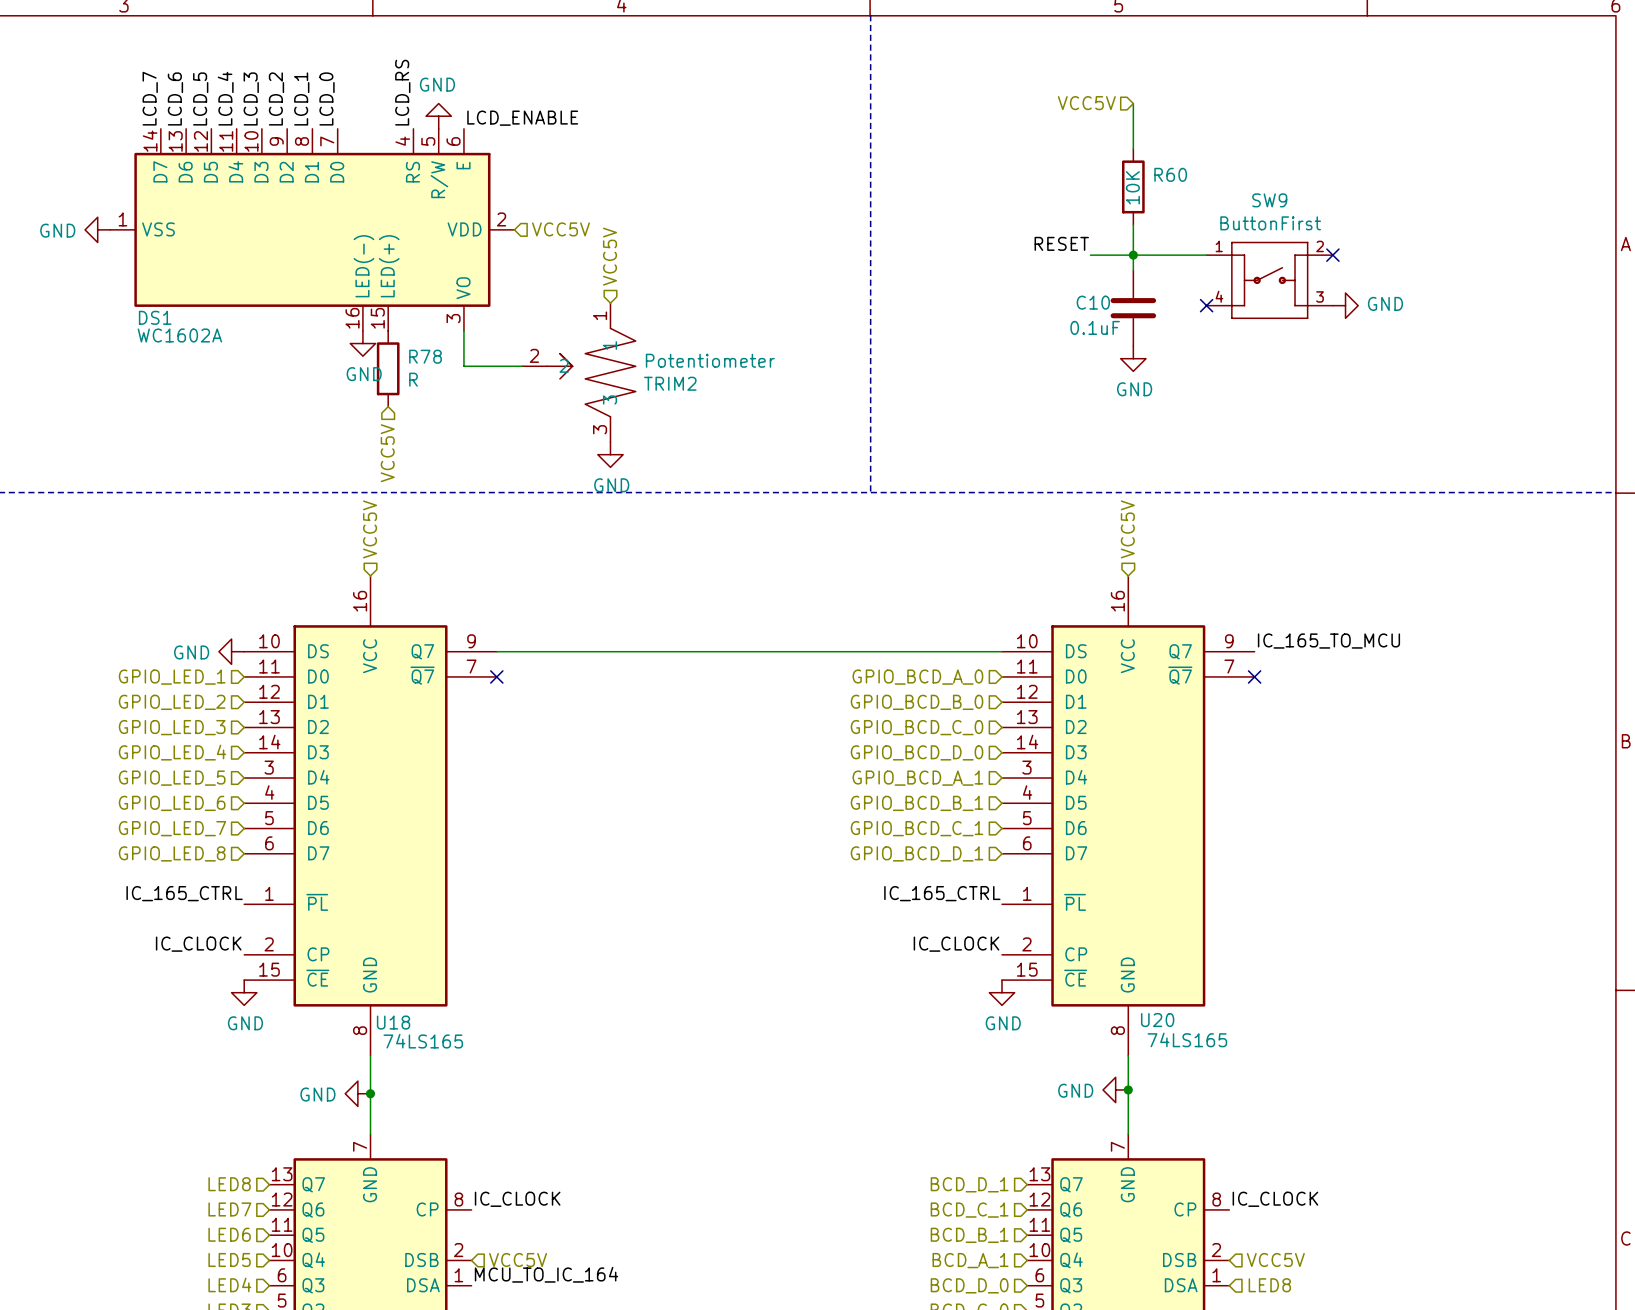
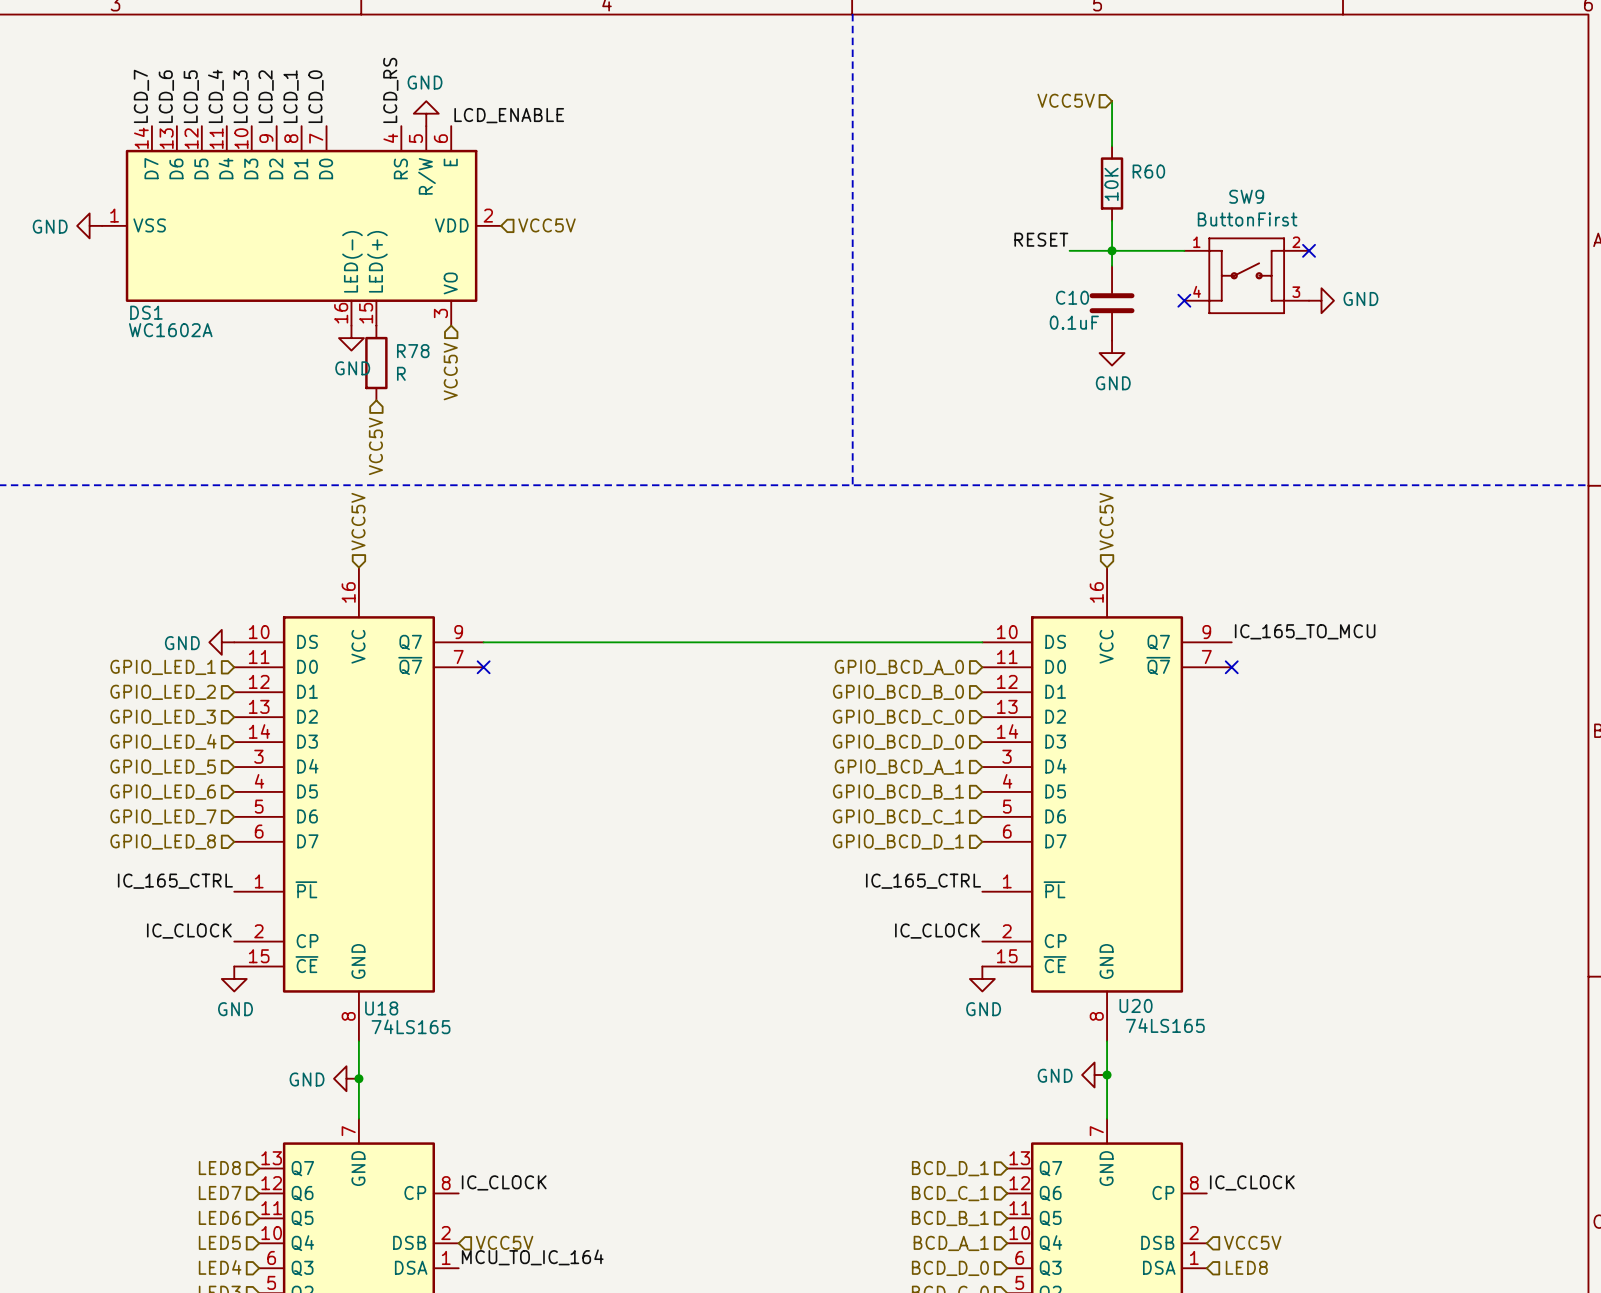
hierarchical label rotation: 0° (610, 256) -> 180° (450, 371)
hierarchical label position: VCC5V (610, 256) -> VCC5V (450, 371)
wire: (463, 330) (463, 366) (522, 366) -> none
TRIM2: Potentiometer (578, 372) -> none
power symbol: GND (610, 454) -> none

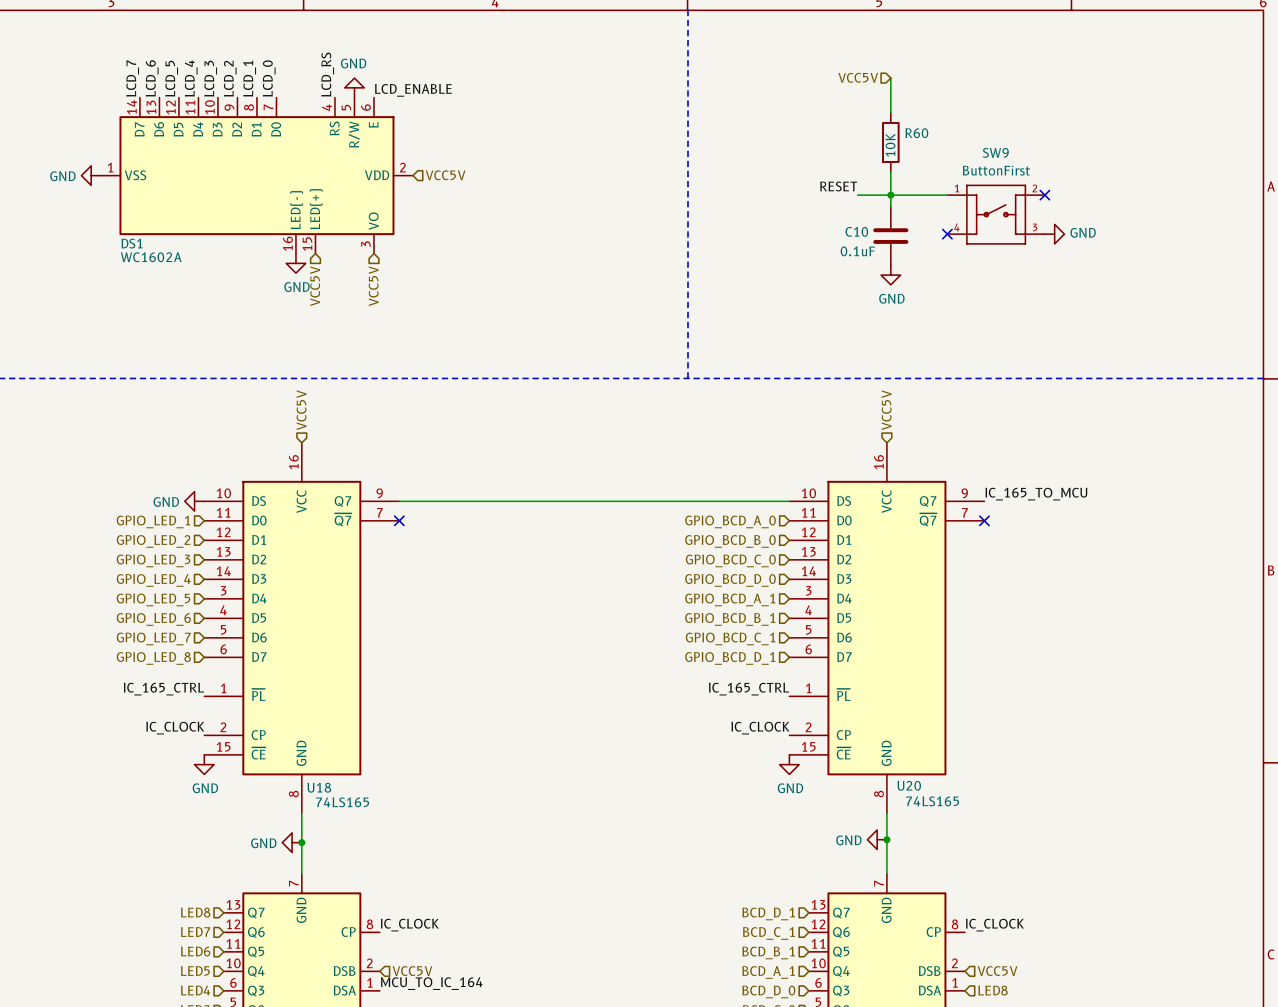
R78: R (376, 363) -> none
hierarchical label position: VCC5V (375, 446) -> VCC5V (315, 286)

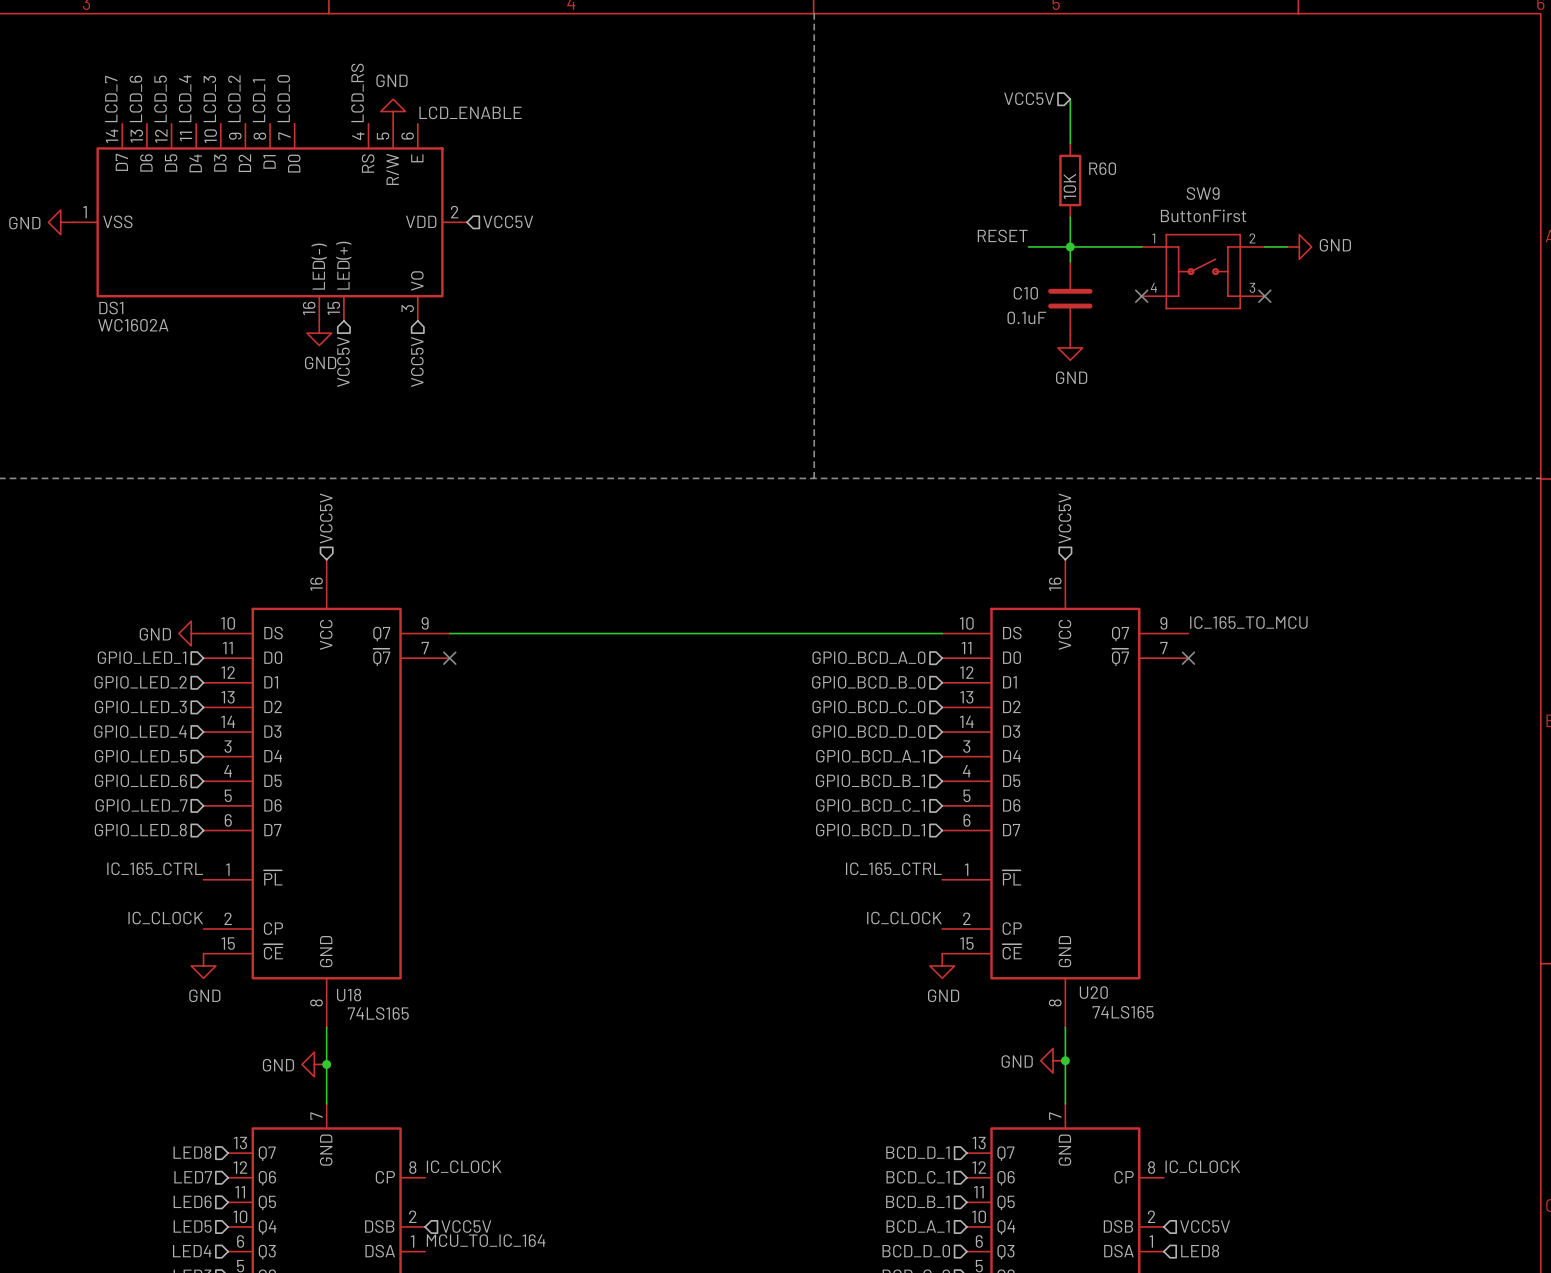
wire: none -> (1264, 246) (1286, 246)
no-connect mark position: (1044, 195) -> (1264, 296)
power symbol position: GND (1054, 234) -> GND (1299, 246)

